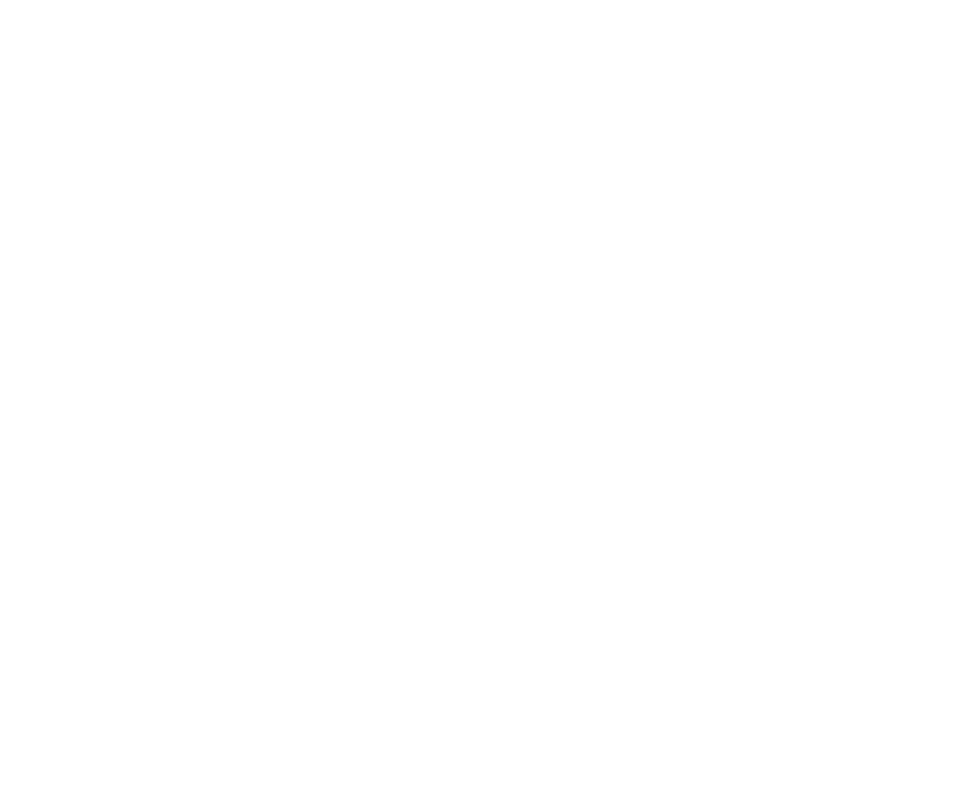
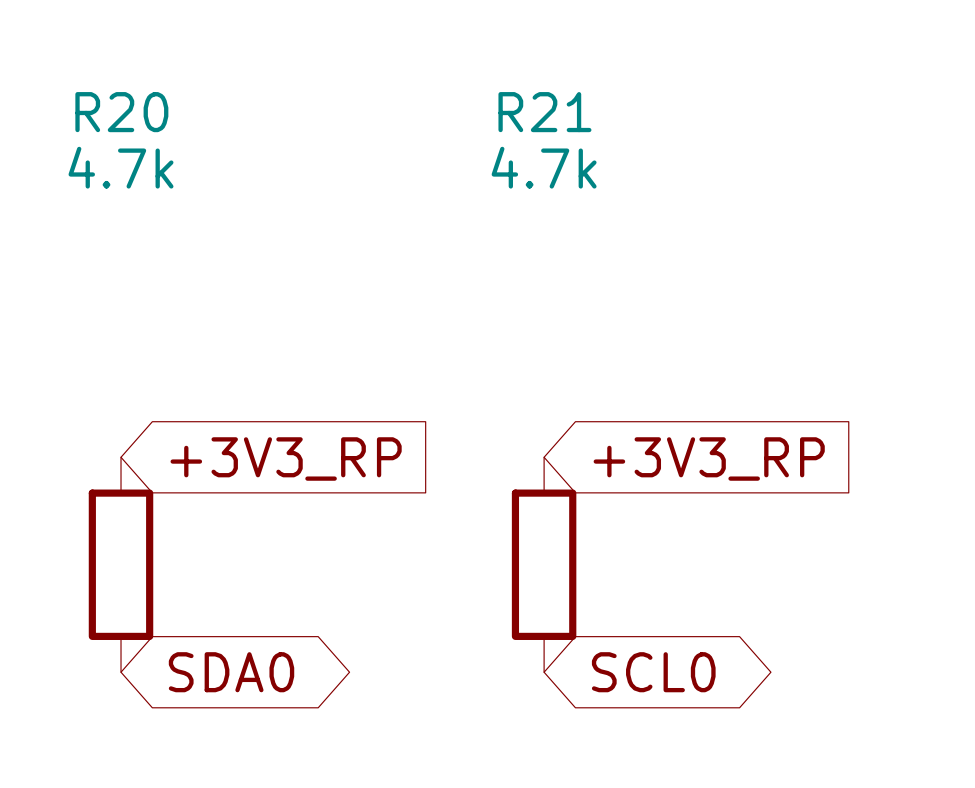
global label: none -> +3V3_RP (286, 458)
global label: none -> +3V3_RP (709, 458)
R20: none -> 4.7k (121, 564)
R21: none -> 4.7k (544, 564)
global label: none -> SDA0 (231, 672)
global label: none -> SCL0 (653, 672)

